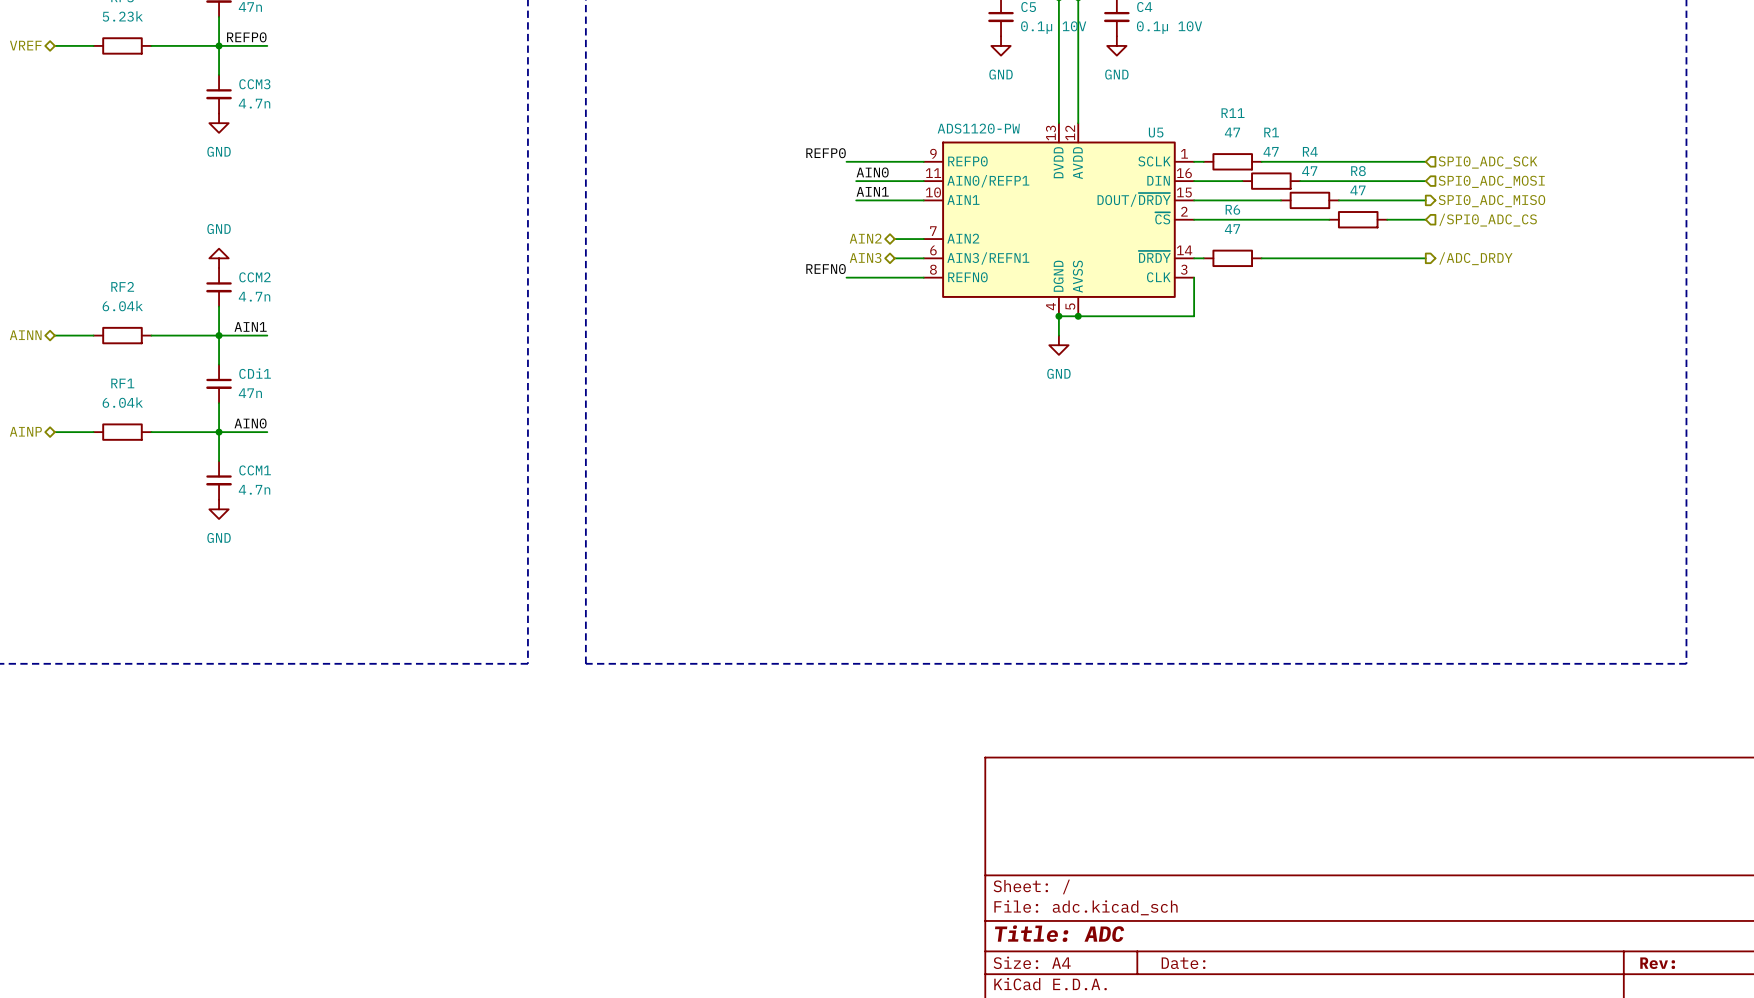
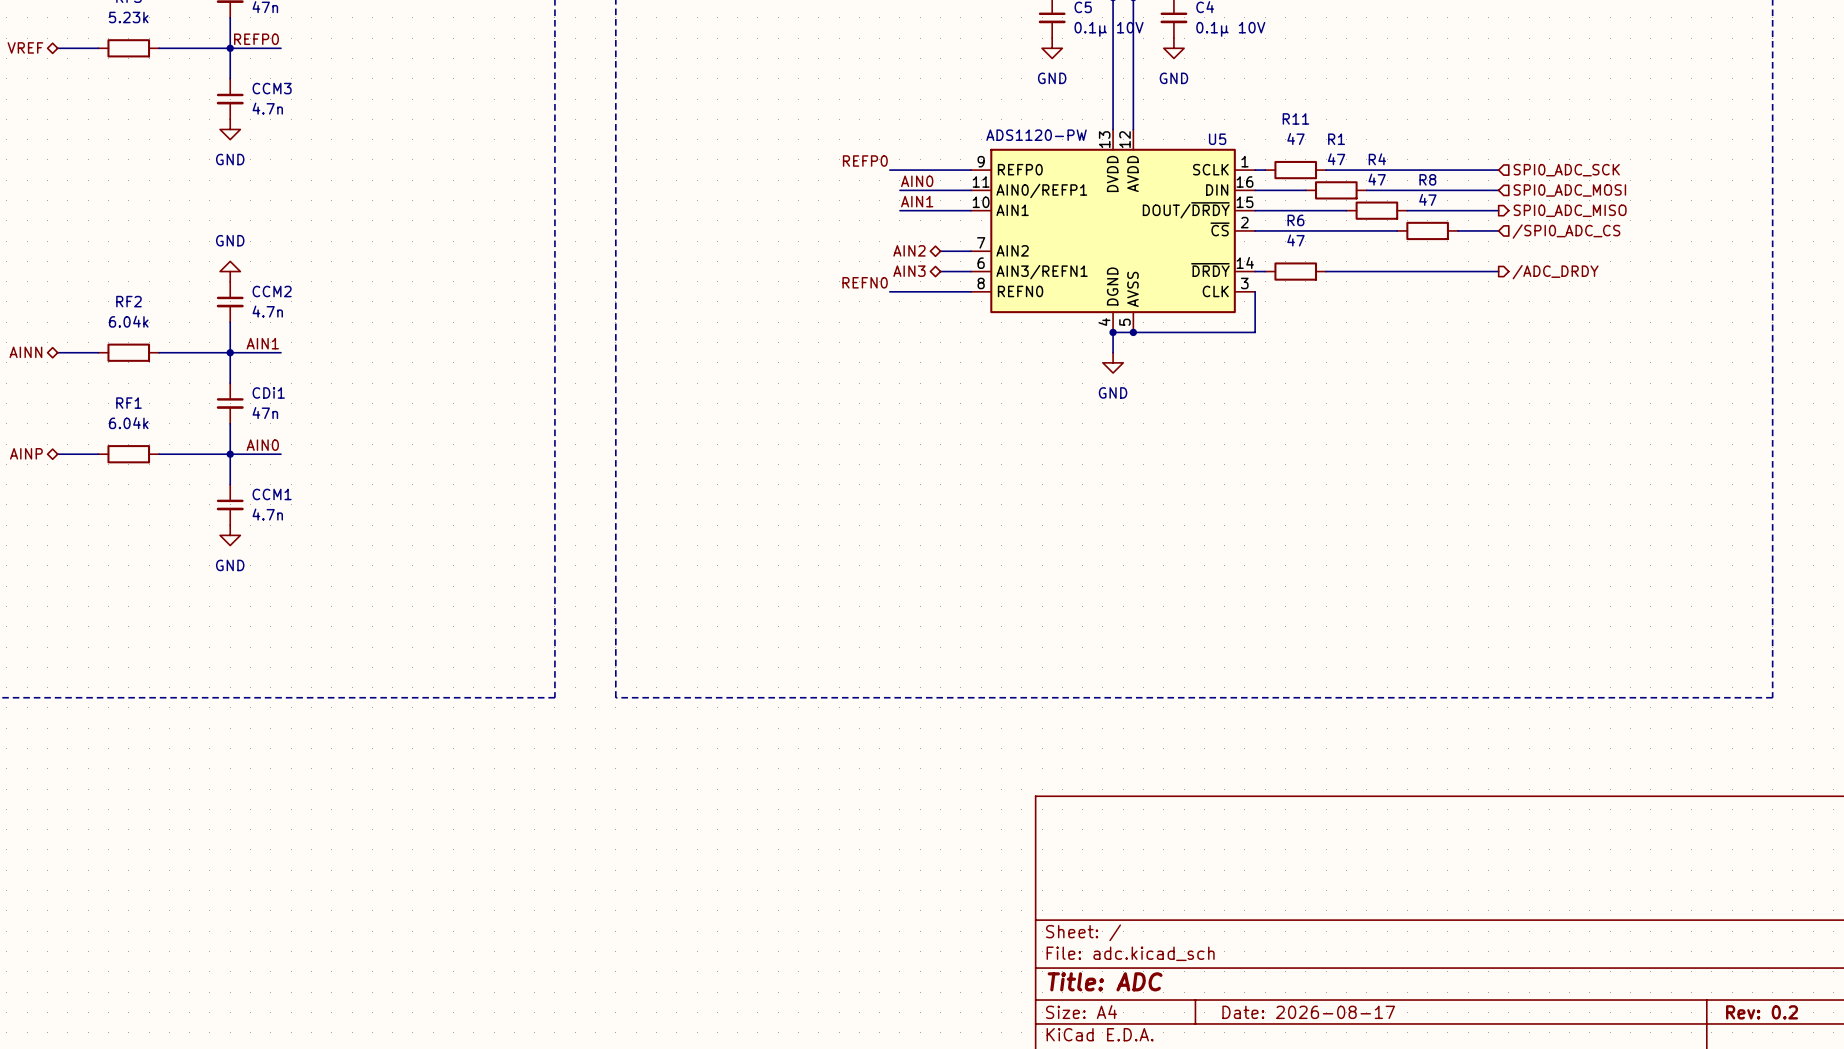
title block: Date: (1183, 963) -> Date: 2026-08-17 (1308, 1012)
title block: Rev: (1657, 963) -> Rev: 0.2 (1762, 1012)

